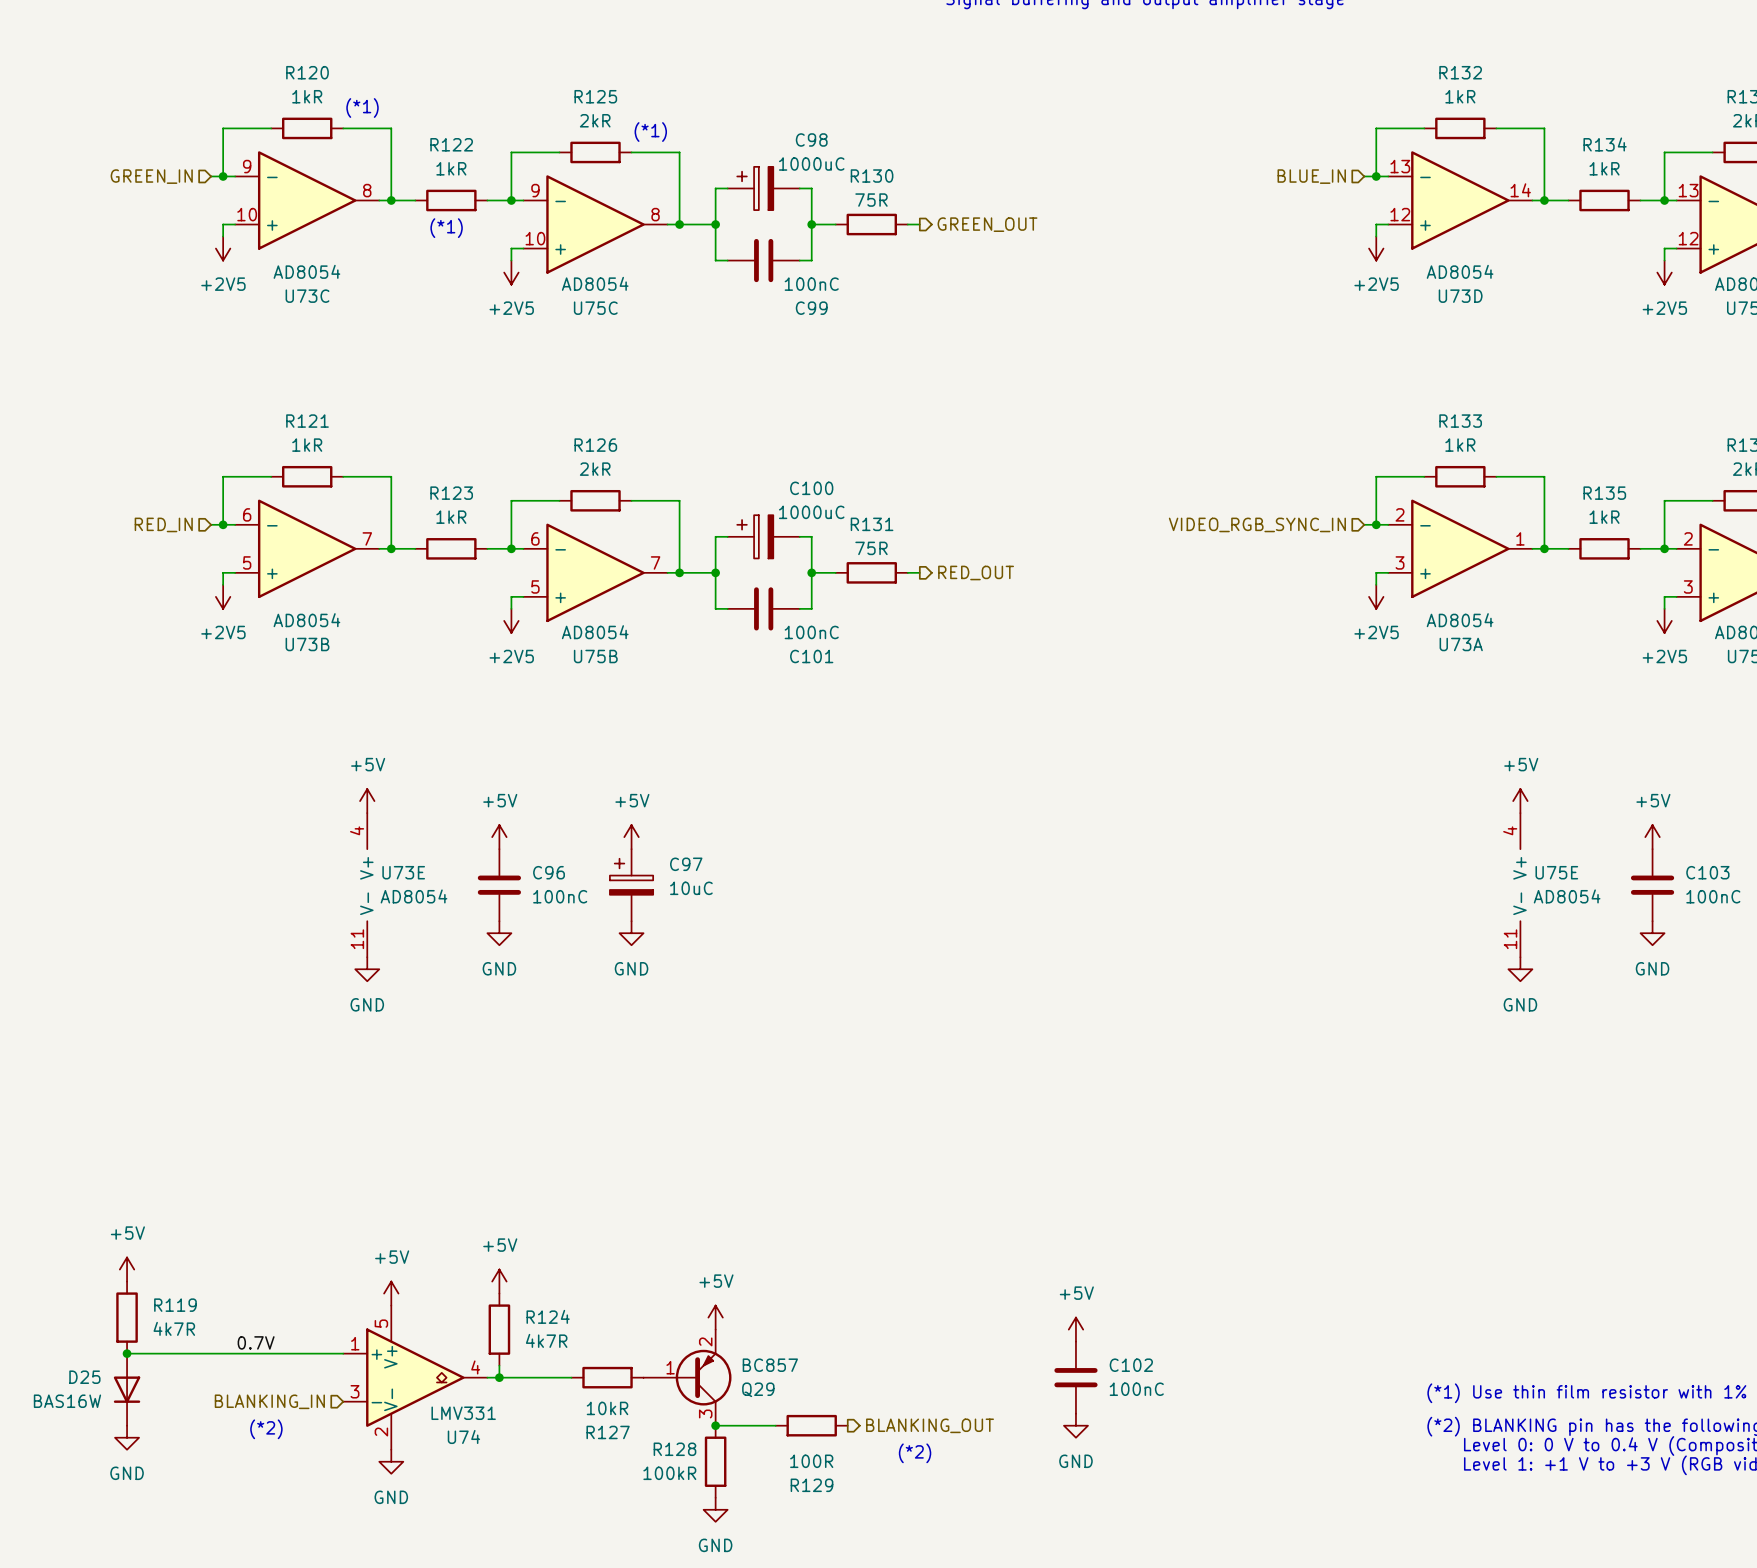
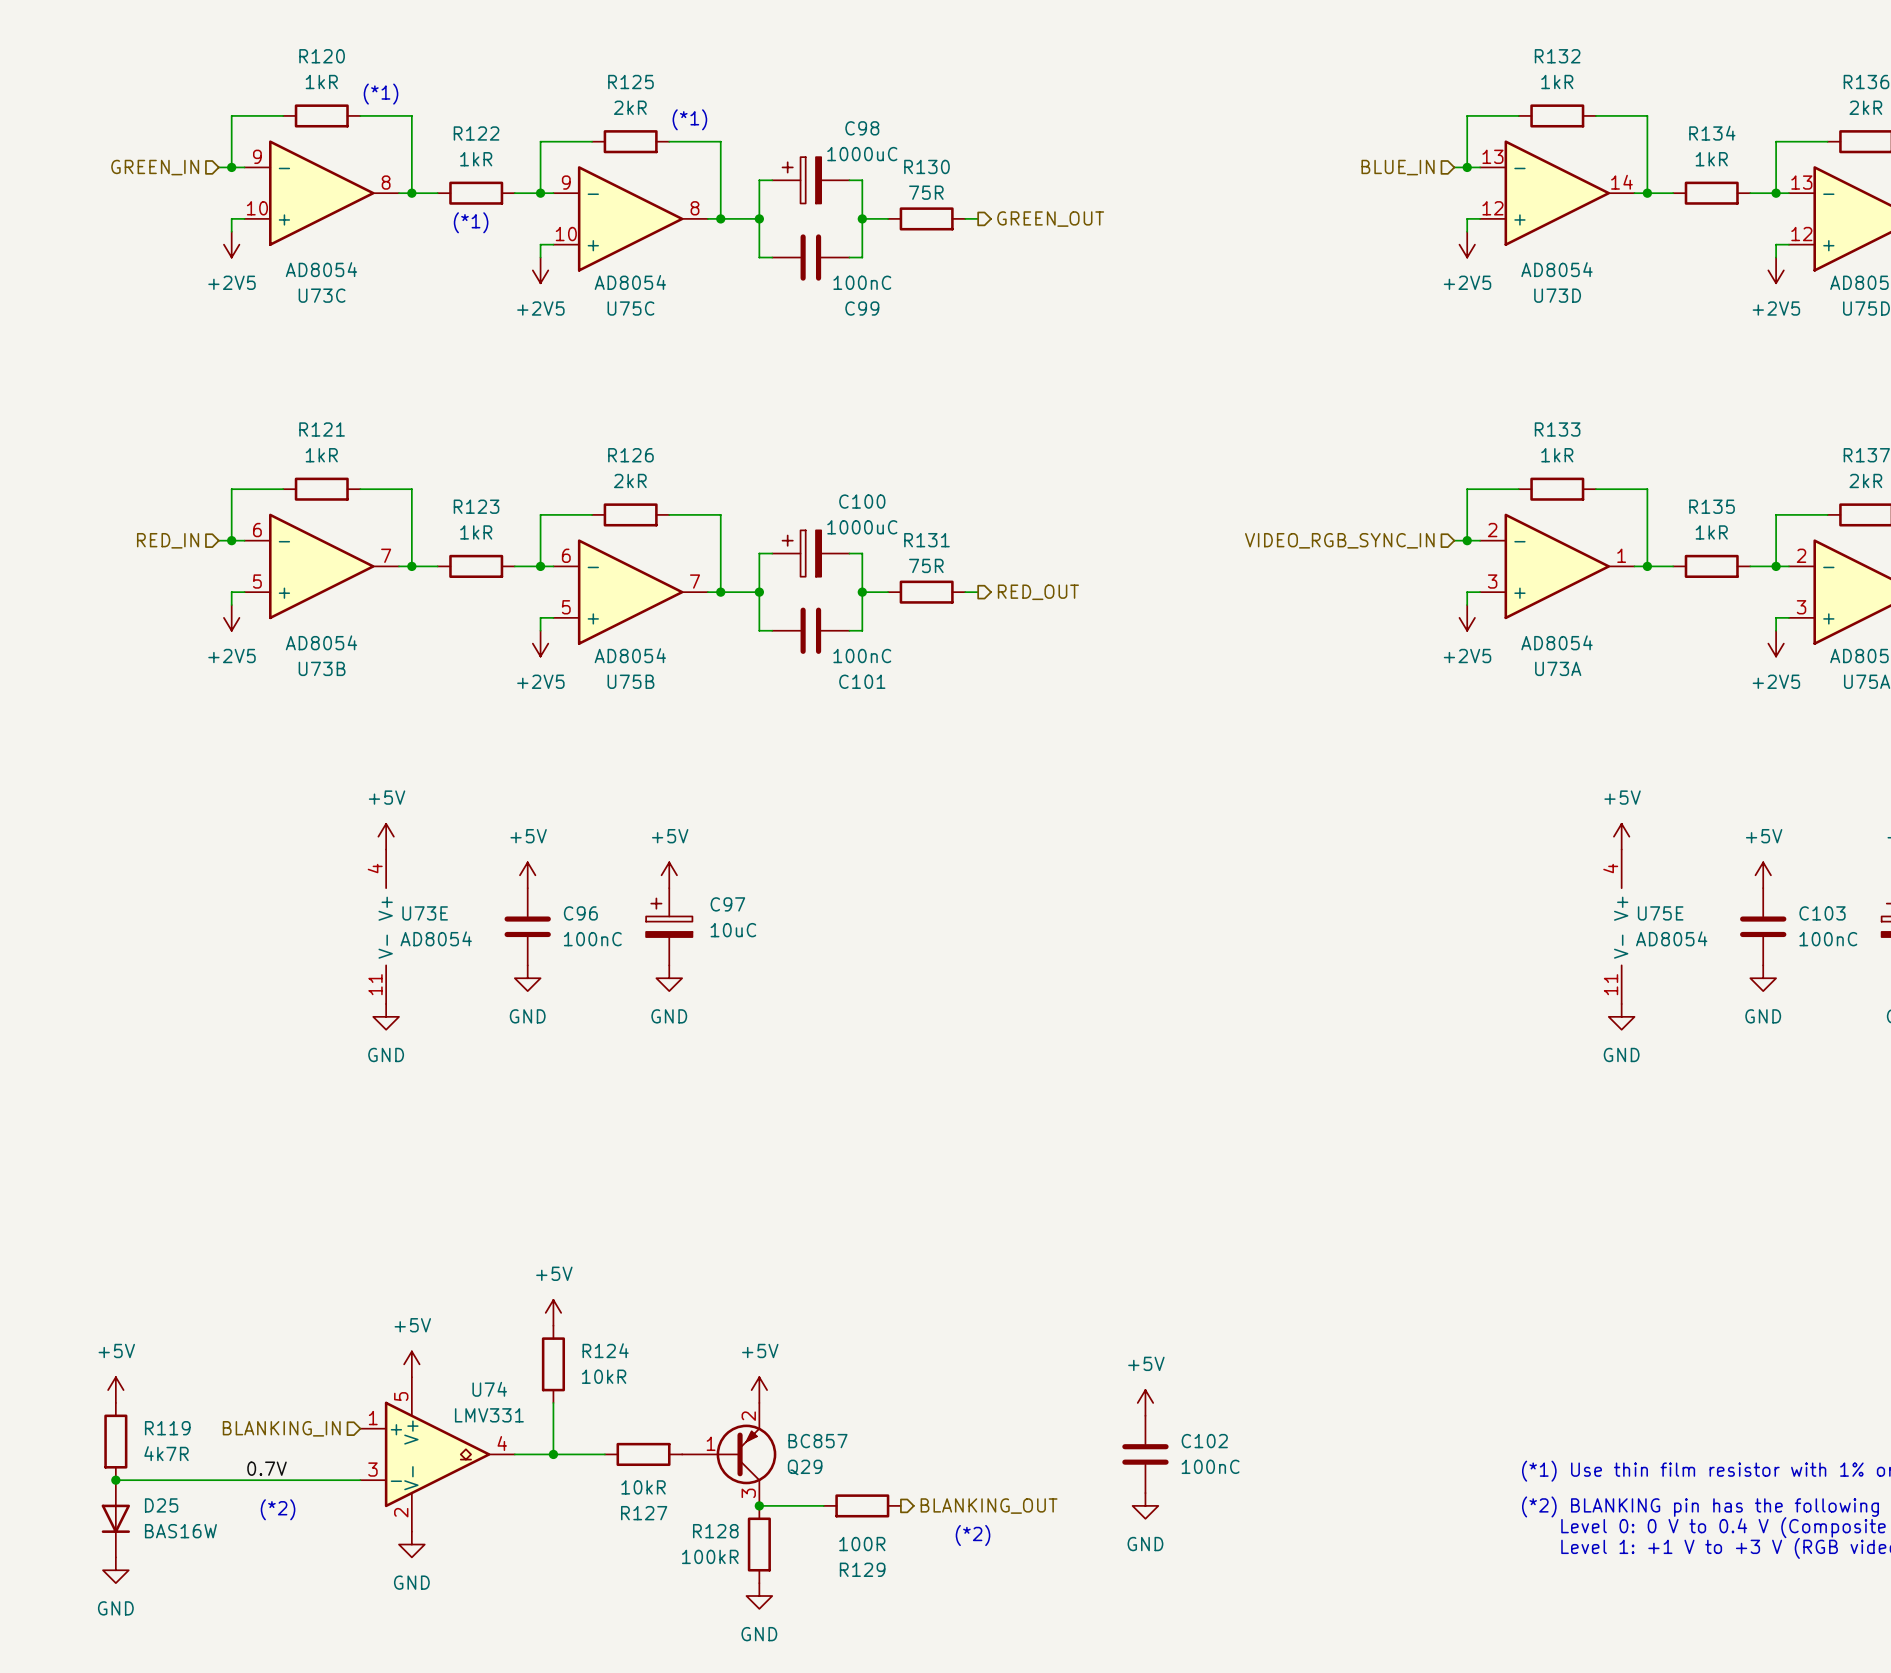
power symbol position: +5V (127, 1269) -> +5V (115, 1390)
power symbol position: +5V (499, 1281) -> +5V (553, 1312)
R119 position: (127, 1317) -> (115, 1441)
R124 position: (499, 1329) -> (553, 1364)
wire: none -> (553, 1402) (553, 1454)
R124 value: 4k7R (546, 1340) -> 10kR (604, 1376)
label position: 0.7V (256, 1342) -> 0.7V (267, 1468)
wire: (127, 1353) (343, 1353) -> none
junction position: (127, 1353) -> (115, 1480)
wire: (499, 1365) (499, 1377) -> none
D25 name position: D25 (84, 1377) -> D25 (161, 1505)
junction position: (499, 1377) -> (553, 1454)
D25 position: (127, 1389) -> (115, 1518)
D25 value position: BAS16W (67, 1401) -> BAS16W (180, 1531)
wire: none -> (115, 1480) (360, 1480)
hierarchical label position: BLANKING_IN (269, 1401) -> BLANKING_IN (281, 1428)
U74 value position: LMV331 (463, 1413) -> LMV331 (489, 1415)
U74 name position: U74 (463, 1436) -> U74 (489, 1389)
power symbol position: GND (127, 1437) -> GND (115, 1570)

